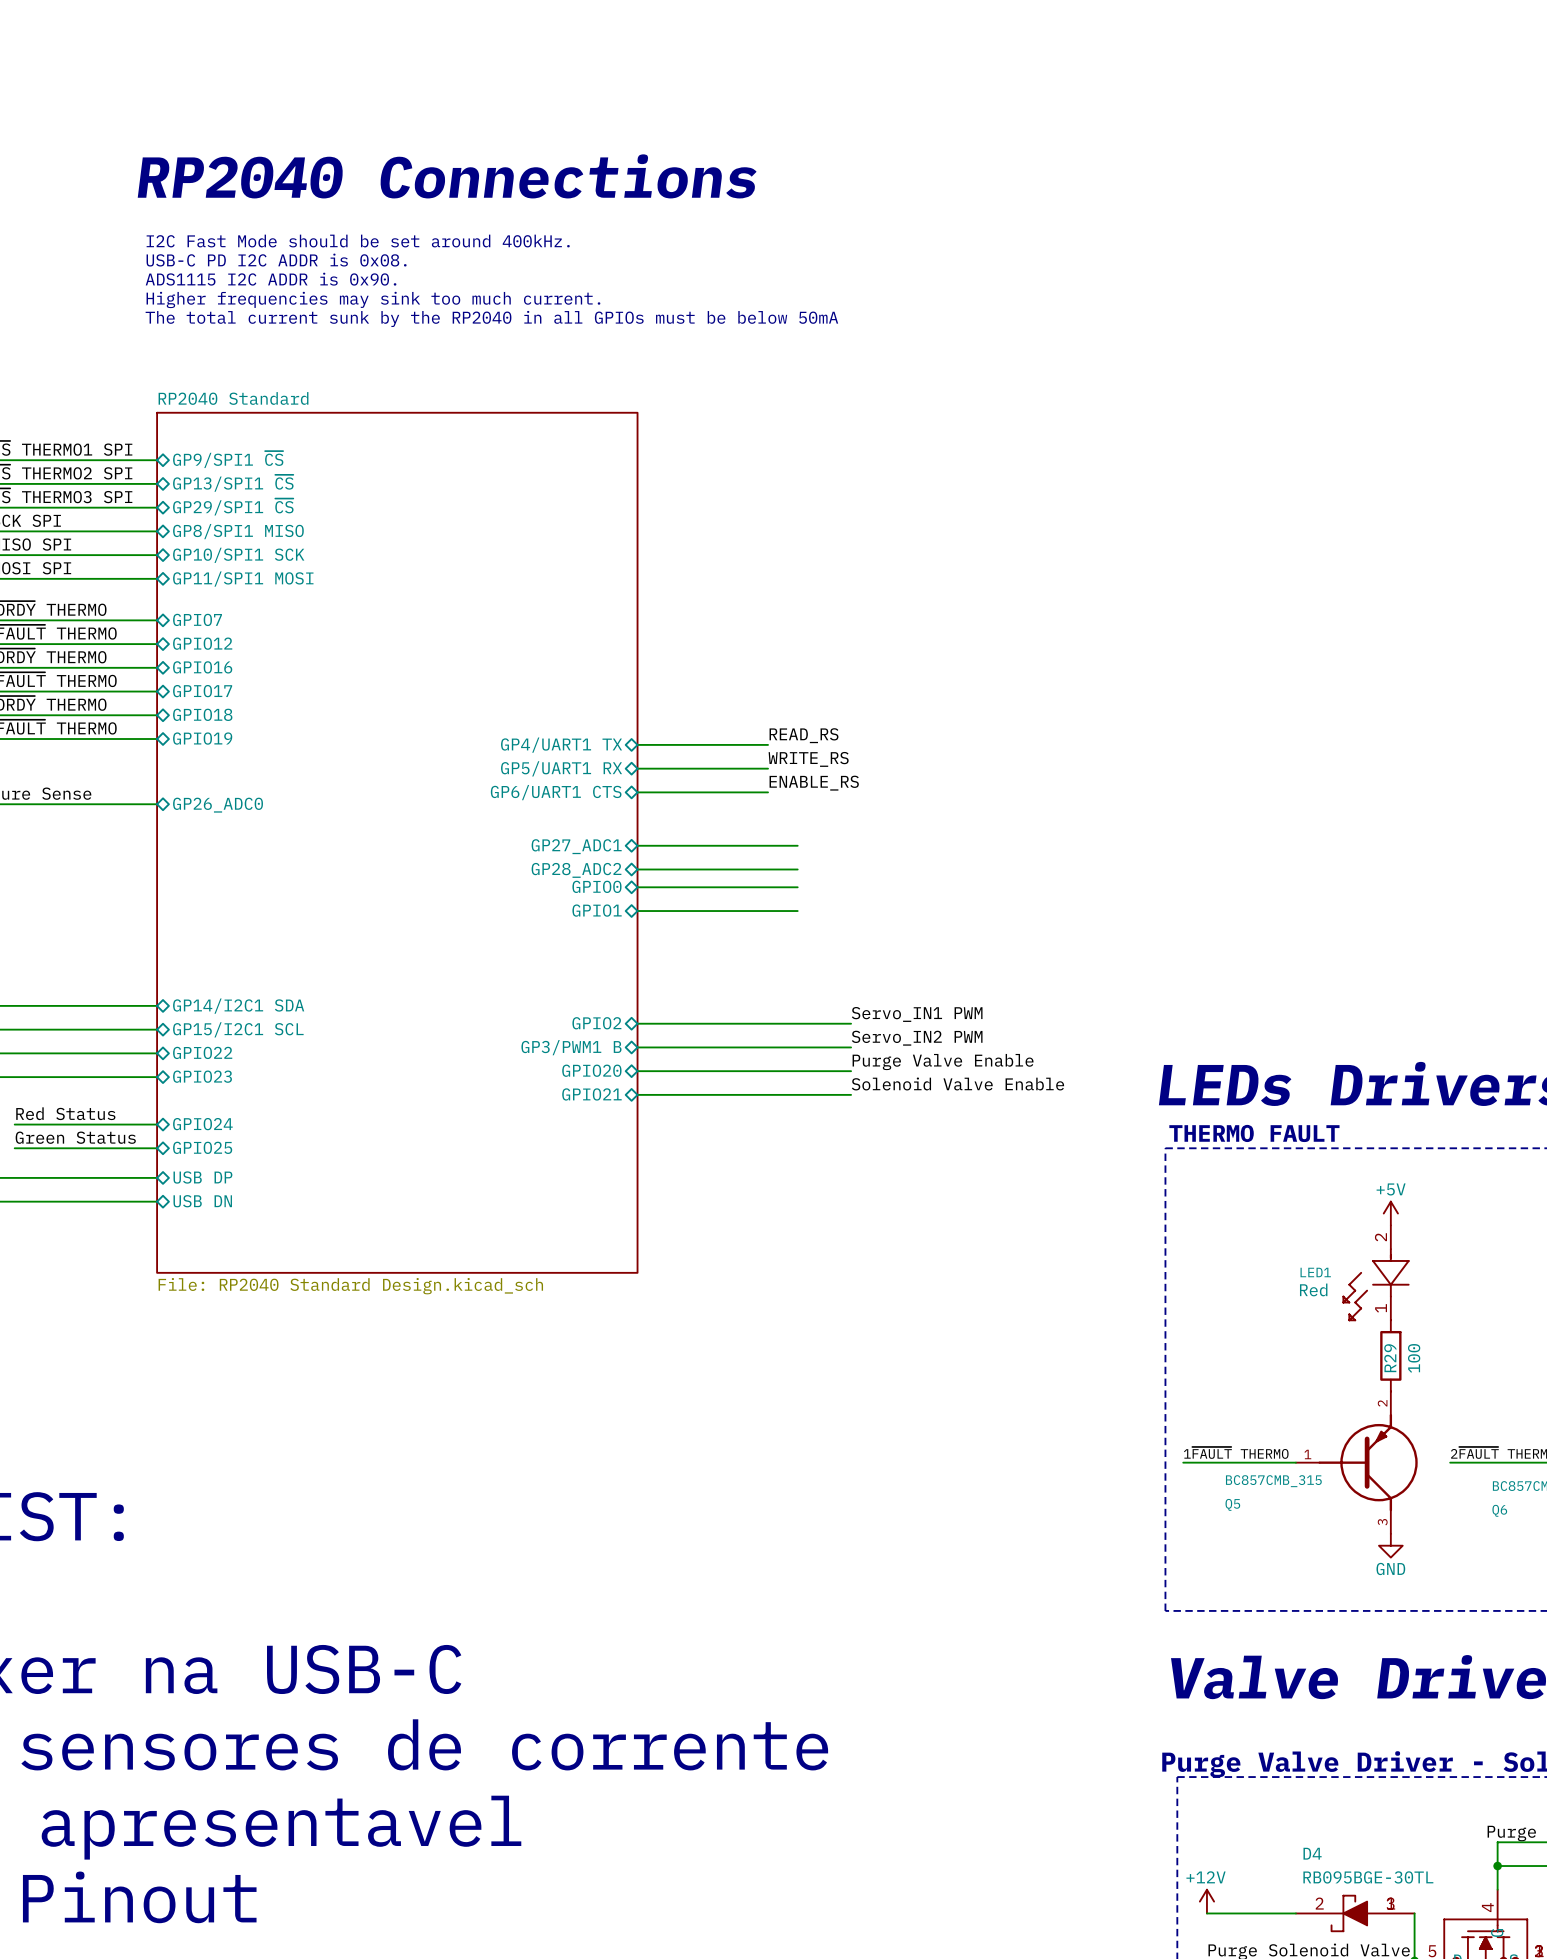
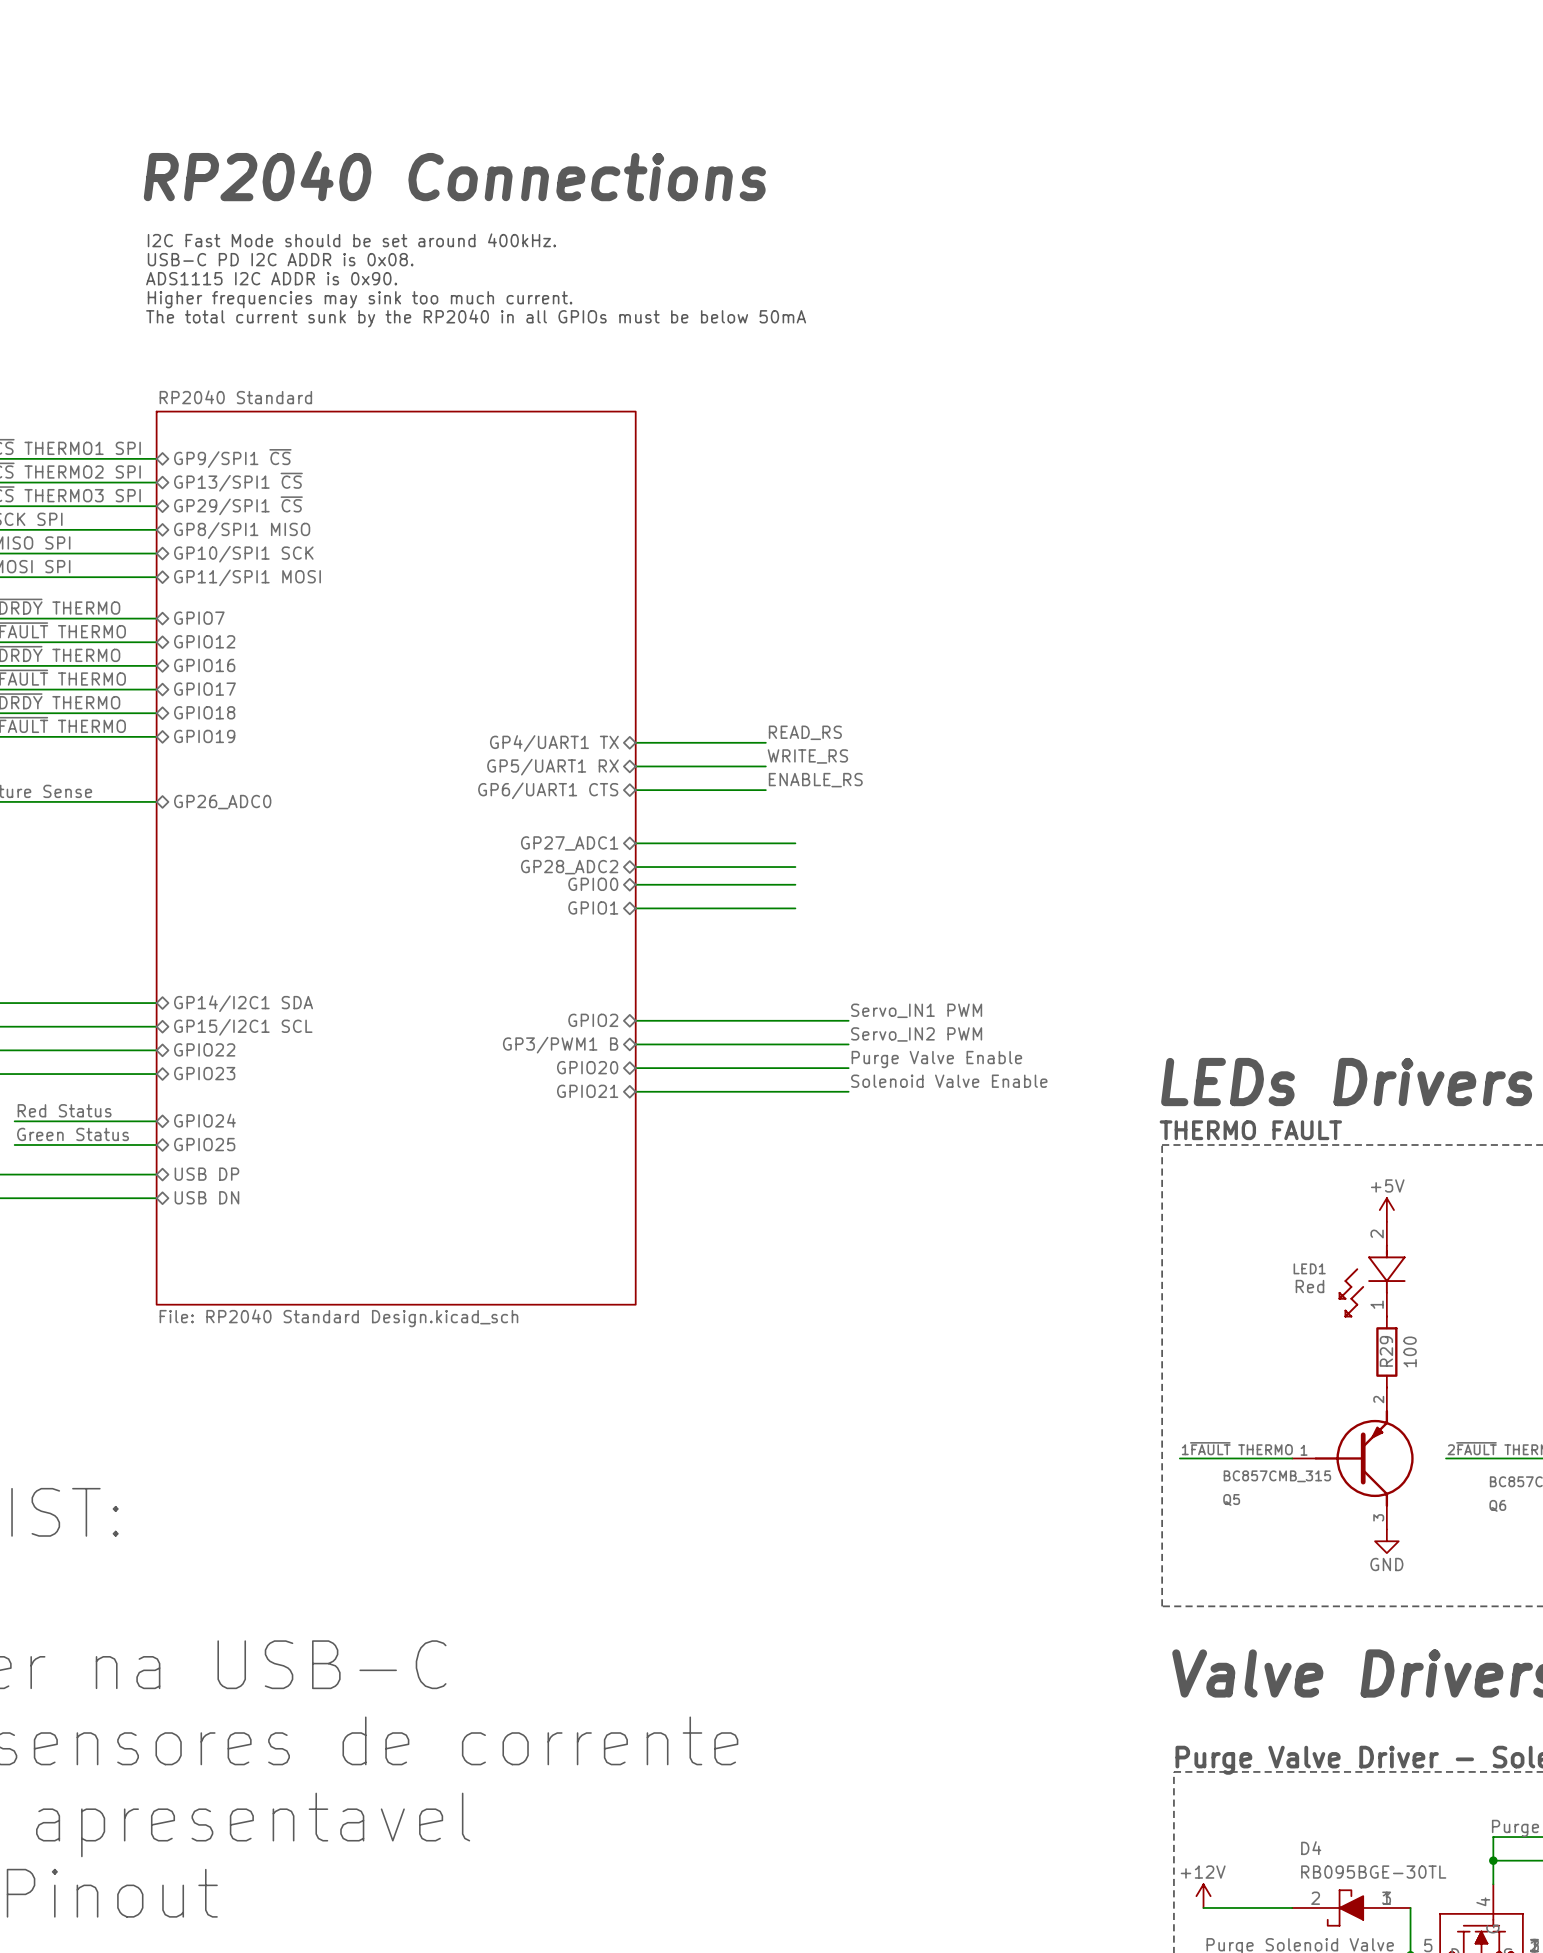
sheet RP2040 Standard shape: [156, 412, 639, 1274] -> [155, 410, 637, 1306]

